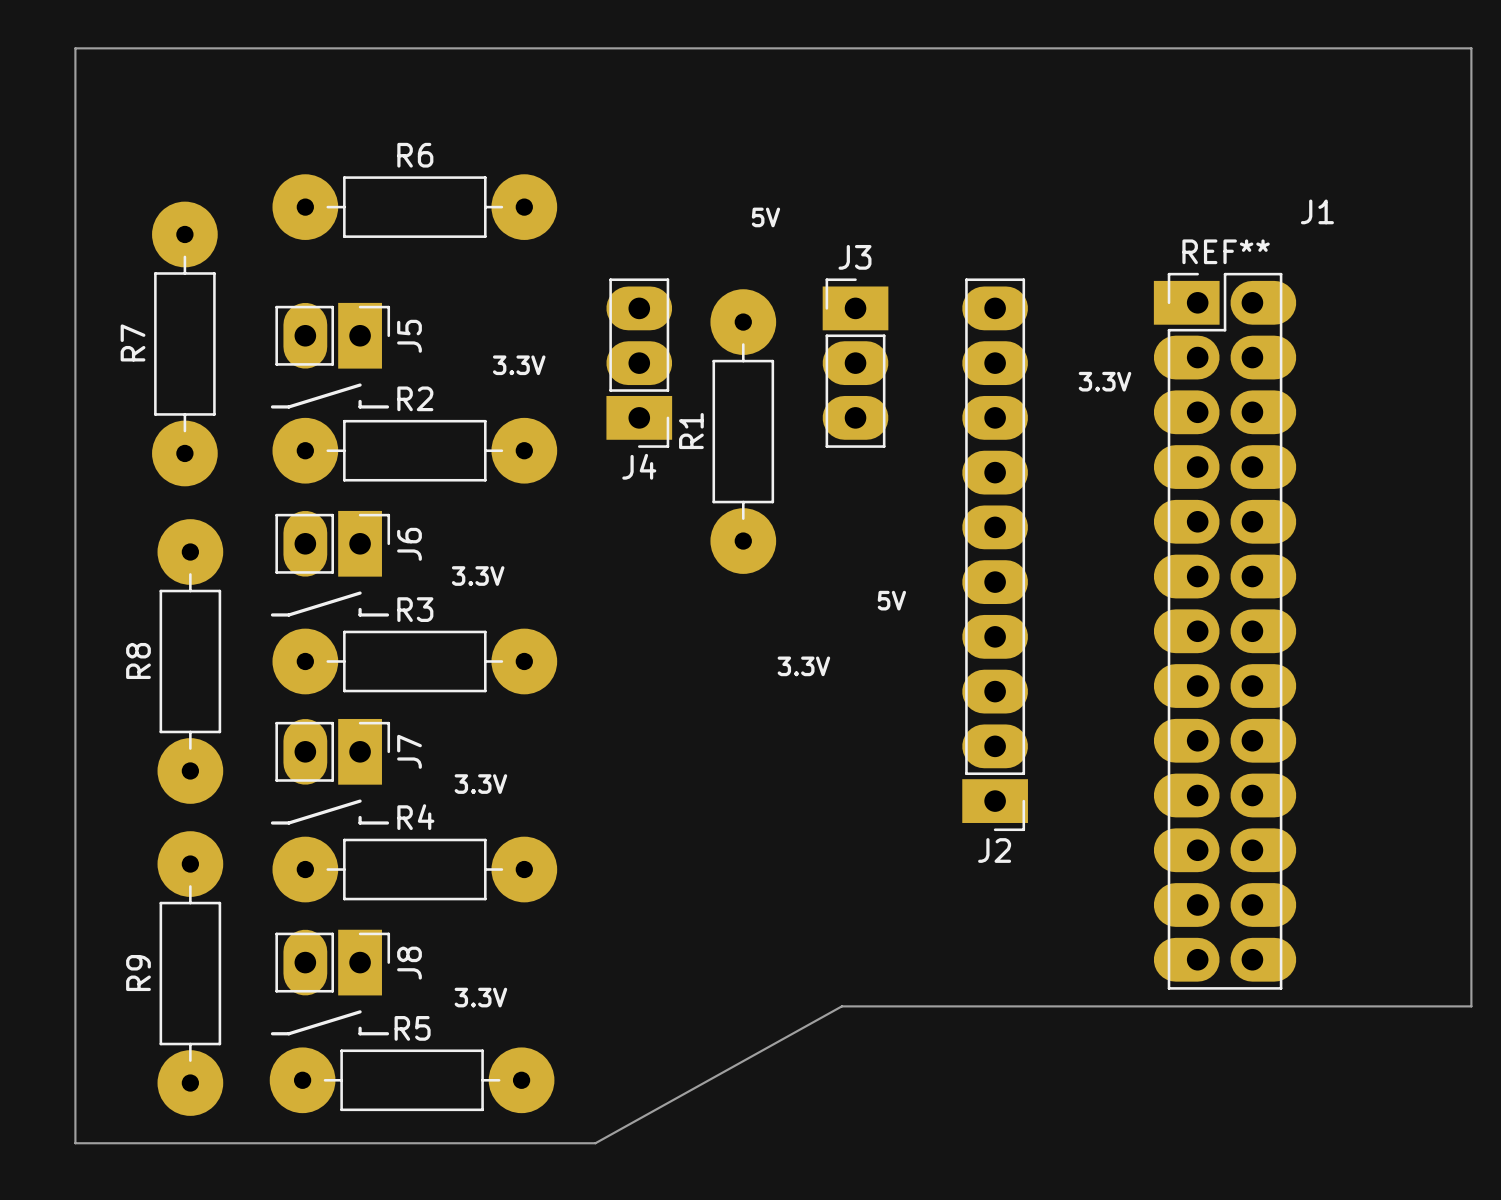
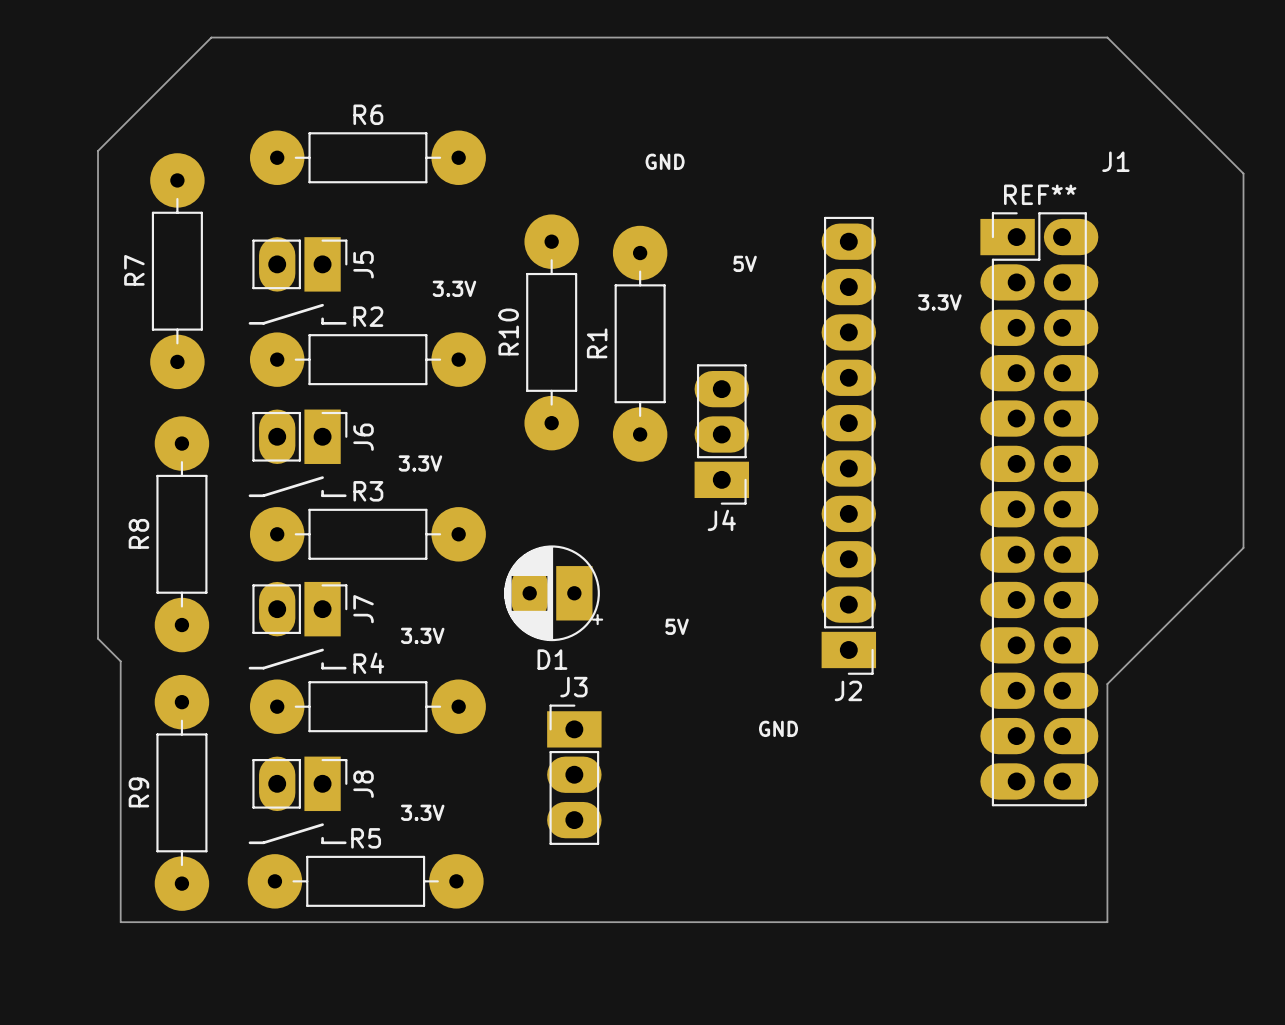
text: 5V (765, 217) -> GND (665, 161)
board edge: (1471, 226) (1471, 48) (75, 48) (75, 1143) (595, 1143) (841, 1006) (1471, 1006) (1471, 677) -> (1243, 173) (1107, 37) (211, 37) (98, 150) (98, 638) (120, 661) (120, 922) (1107, 922) (1107, 684) (1243, 547)
text: none -> 5V (745, 263)
J4 position: (639, 363) -> (721, 434)
J3 position: (855, 363) -> (574, 774)
R10: none -> (551, 332)
text: 5V (891, 600) -> none
text: 3.3V (803, 666) -> none
D1: none -> (553, 593)
text: none -> 5V (677, 626)
text: none -> GND (778, 728)

